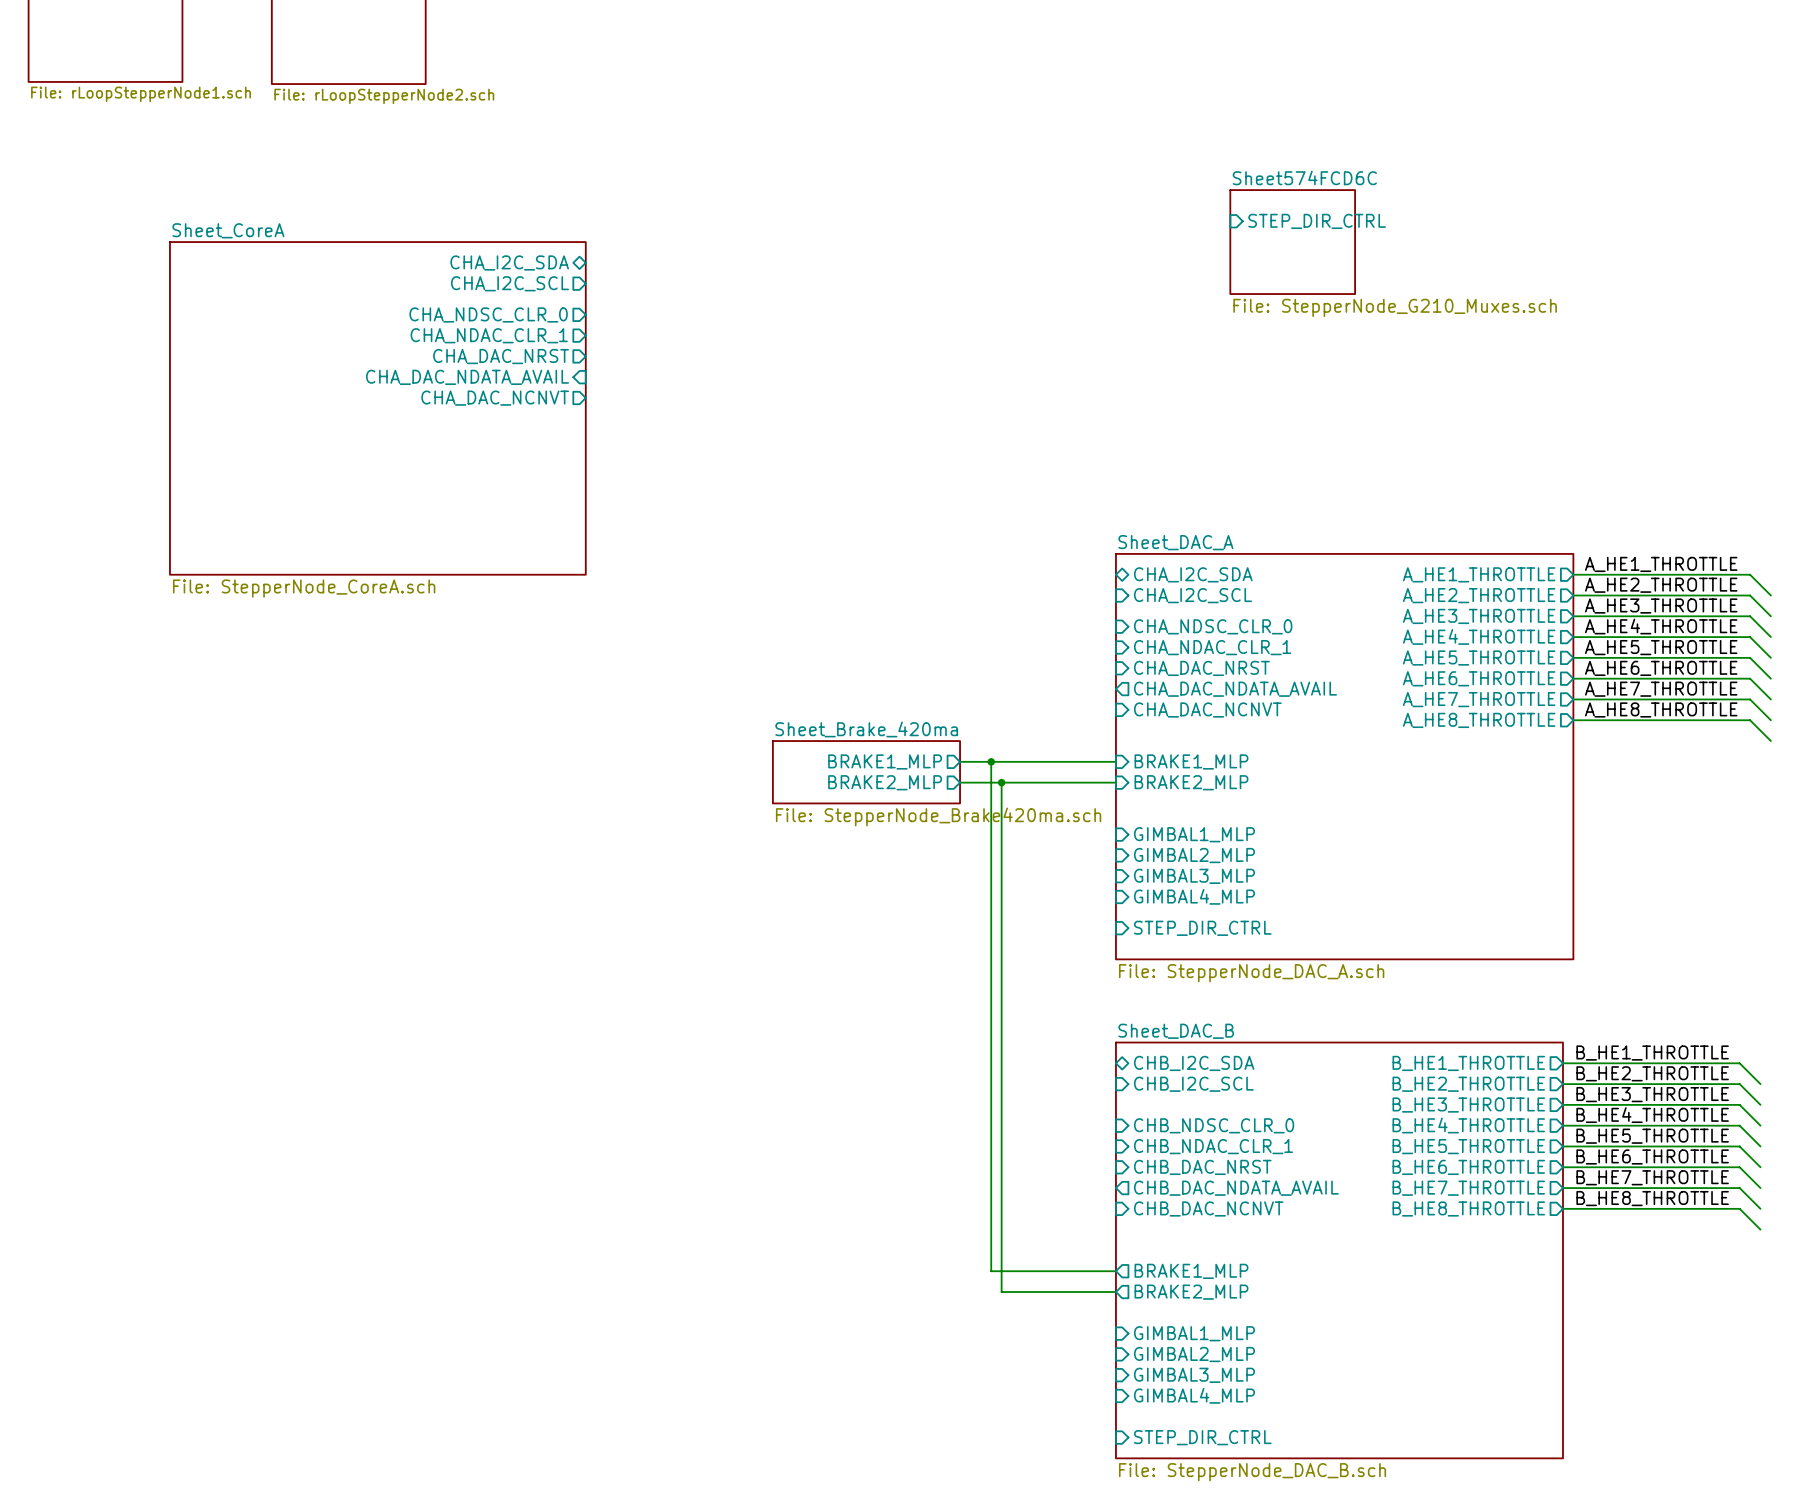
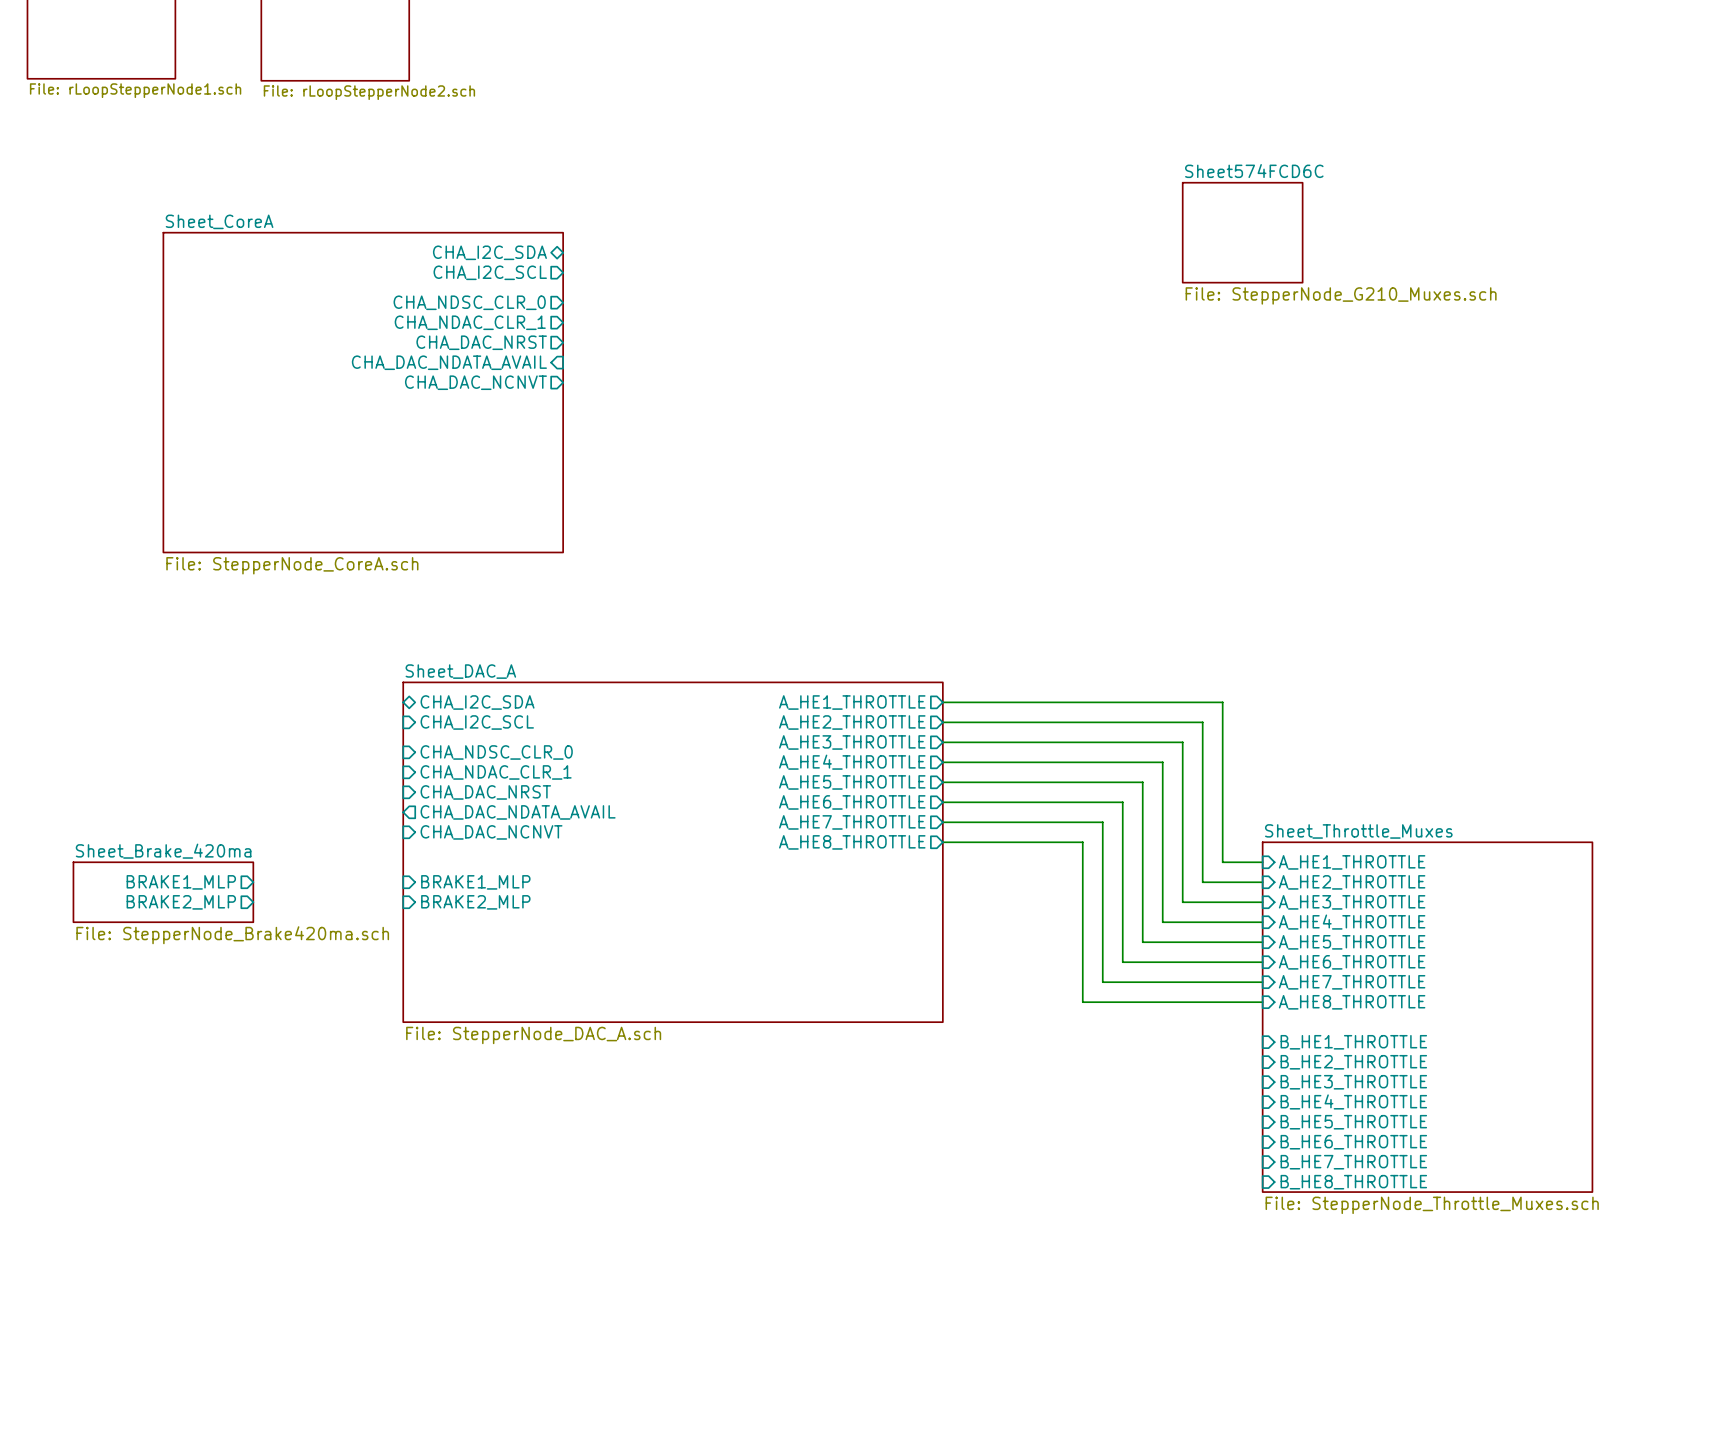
sheet pin: STEP_DIR_CTRL (1317, 221) -> none
label: A_HE1_THROTTLE (1661, 564) -> none
sheet pin: CHA_I2C_SDA (1193, 574) -> none
sheet pin: A_HE1_THROTTLE (1479, 574) -> none
wire: (1573, 574) (1750, 574) (1770, 595) -> none
label: A_HE2_THROTTLE (1661, 585) -> none
sheet pin: CHA_I2C_SCL (1192, 595) -> none
sheet pin: A_HE2_THROTTLE (1479, 595) -> none
wire: (1573, 595) (1750, 595) (1770, 616) -> none
label: A_HE3_THROTTLE (1661, 606) -> none
sheet pin: A_HE3_THROTTLE (1479, 616) -> none
wire: (1573, 616) (1750, 616) (1770, 637) -> none
sheet pin: CHA_NDSC_CLR_0 (1213, 626) -> none
label: A_HE4_THROTTLE (1661, 626) -> none
sheet pin: A_HE4_THROTTLE (1479, 636) -> none
wire: (1573, 637) (1750, 637) (1770, 657) -> none
sheet pin: CHA_NDAC_CLR_1 (1212, 647) -> none
label: A_HE5_THROTTLE (1661, 647) -> none
wire: (1573, 657) (1750, 657) (1770, 678) -> none
sheet pin: A_HE5_THROTTLE (1479, 658) -> none
sheet pin: CHA_DAC_NRST (1201, 668) -> none
label: A_HE6_THROTTLE (1661, 668) -> none
sheet pin: A_HE6_THROTTLE (1479, 678) -> none
wire: (1573, 678) (1750, 678) (1770, 699) -> none
sheet pin: CHA_DAC_NDATA_AVAIL (1235, 689) -> none
label: A_HE7_THROTTLE (1661, 689) -> none
sheet pin: A_HE7_THROTTLE (1479, 699) -> none
wire: (1573, 699) (1750, 699) (1770, 720) -> none
sheet pin: CHA_DAC_NCNVT (1207, 709) -> none
label: A_HE8_THROTTLE (1661, 709) -> none
sheet pin: A_HE8_THROTTLE (1479, 720) -> none
wire: (1573, 720) (1750, 720) (1770, 741) -> none
sheet pin: none -> CHA_I2C_SDA (477, 702)
sheet pin: none -> A_HE1_THROTTLE (852, 702)
wire: none -> (942, 702) (1222, 702) (1222, 862) (1262, 862)
sheet pin: none -> CHA_I2C_SCL (477, 722)
sheet pin: none -> A_HE2_THROTTLE (852, 722)
wire: none -> (942, 722) (1202, 722) (1202, 882) (1262, 882)
sheet Sheet_DAC_A: File: StepperNode_DAC_A.sch (1344, 756) -> none
sheet pin: BRAKE1_MLP (885, 761) -> none
wire: (960, 761) (1115, 761) -> none
wire: (991, 761) (991, 1271) (1115, 1271) -> none
junction: (991, 761) -> none
sheet pin: BRAKE1_MLP (1191, 761) -> none
sheet Sheet_Brake_420ma position: (866, 772) -> (163, 892)
sheet pin: none -> A_HE3_THROTTLE (852, 742)
wire: none -> (942, 742) (1182, 742) (1182, 902) (1262, 902)
sheet pin: none -> CHA_NDSC_CLR_0 (496, 752)
sheet pin: BRAKE2_MLP (885, 782) -> none
wire: (960, 782) (1115, 782) -> none
wire: (1001, 782) (1001, 1292) (1115, 1292) -> none
junction: (1001, 782) -> none
sheet pin: BRAKE2_MLP (1191, 782) -> none
sheet pin: none -> A_HE4_THROTTLE (852, 762)
wire: none -> (942, 762) (1162, 762) (1162, 922) (1262, 922)
sheet pin: none -> CHA_NDAC_CLR_1 (496, 772)
sheet pin: none -> A_HE5_THROTTLE (852, 782)
wire: none -> (942, 782) (1142, 782) (1142, 942) (1262, 942)
sheet pin: none -> CHA_DAC_NRST (485, 792)
sheet pin: none -> A_HE6_THROTTLE (852, 802)
wire: none -> (942, 802) (1122, 802) (1122, 962) (1262, 962)
sheet pin: GIMBAL1_MLP (1194, 834) -> none
sheet pin: none -> CHA_DAC_NDATA_AVAIL (518, 812)
sheet pin: none -> A_HE7_THROTTLE (852, 822)
wire: none -> (942, 822) (1102, 822) (1102, 982) (1262, 982)
sheet pin: GIMBAL2_MLP (1194, 855) -> none
sheet pin: none -> CHA_DAC_NCNVT (491, 832)
sheet pin: none -> A_HE8_THROTTLE (852, 842)
wire: none -> (942, 842) (1082, 842) (1082, 1002) (1262, 1002)
sheet pin: GIMBAL3_MLP (1194, 876) -> none
sheet Sheet_DAC_A: none -> File: StepperNode_DAC_A.sch (673, 852)
sheet pin: GIMBAL4_MLP (1194, 896) -> none
sheet pin: none -> A_HE1_THROTTLE (1352, 862)
sheet pin: none -> BRAKE1_MLP (181, 882)
sheet pin: none -> BRAKE1_MLP (475, 882)
sheet pin: none -> A_HE2_THROTTLE (1352, 882)
sheet pin: STEP_DIR_CTRL (1202, 928) -> none
sheet pin: none -> BRAKE2_MLP (181, 902)
sheet pin: none -> BRAKE2_MLP (475, 902)
sheet pin: none -> A_HE3_THROTTLE (1352, 902)
sheet pin: none -> A_HE4_THROTTLE (1352, 922)
sheet pin: none -> A_HE5_THROTTLE (1352, 942)
sheet pin: none -> A_HE6_THROTTLE (1352, 962)
sheet pin: none -> A_HE7_THROTTLE (1352, 982)
sheet pin: none -> A_HE8_THROTTLE (1352, 1002)
label: B_HE1_THROTTLE (1652, 1053) -> none
sheet Sheet_Throttle_Muxes: none -> File: StepperNode_Throttle_Muxes.sch (1427, 1017)
sheet pin: CHB_I2C_SDA (1194, 1063) -> none
sheet pin: B_HE1_THROTTLE (1468, 1063) -> none
wire: (1562, 1063) (1739, 1063) (1760, 1084) -> none
label: B_HE2_THROTTLE (1652, 1073) -> none
sheet pin: CHB_I2C_SCL (1193, 1084) -> none
sheet pin: none -> B_HE1_THROTTLE (1353, 1042)
sheet pin: B_HE2_THROTTLE (1468, 1084) -> none
wire: (1562, 1084) (1739, 1084) (1760, 1104) -> none
label: B_HE3_THROTTLE (1652, 1094) -> none
wire: (1562, 1104) (1739, 1104) (1760, 1125) -> none
sheet pin: none -> B_HE2_THROTTLE (1353, 1062)
sheet pin: B_HE3_THROTTLE (1468, 1105) -> none
label: B_HE4_THROTTLE (1652, 1115) -> none
sheet pin: CHB_NDSC_CLR_0 (1214, 1125) -> none
sheet pin: none -> B_HE3_THROTTLE (1353, 1082)
sheet pin: B_HE4_THROTTLE (1468, 1125) -> none
wire: (1562, 1125) (1739, 1125) (1760, 1146) -> none
label: B_HE5_THROTTLE (1652, 1136) -> none
sheet pin: CHB_NDAC_CLR_1 (1213, 1146) -> none
sheet pin: none -> B_HE4_THROTTLE (1353, 1101)
sheet pin: B_HE5_THROTTLE (1468, 1146) -> none
wire: (1562, 1146) (1739, 1146) (1760, 1167) -> none
label: B_HE6_THROTTLE (1652, 1156) -> none
sheet pin: CHB_DAC_NRST (1202, 1167) -> none
sheet pin: none -> B_HE5_THROTTLE (1353, 1122)
sheet pin: B_HE6_THROTTLE (1468, 1167) -> none
wire: (1562, 1167) (1739, 1167) (1760, 1188) -> none
label: B_HE7_THROTTLE (1652, 1177) -> none
sheet pin: CHB_DAC_NDATA_AVAIL (1236, 1188) -> none
sheet pin: none -> B_HE6_THROTTLE (1353, 1142)
sheet pin: B_HE7_THROTTLE (1468, 1188) -> none
wire: (1562, 1188) (1739, 1188) (1760, 1208) -> none
label: B_HE8_THROTTLE (1652, 1198) -> none
sheet pin: CHB_DAC_NCNVT (1208, 1208) -> none
sheet pin: none -> B_HE7_THROTTLE (1353, 1162)
sheet pin: B_HE8_THROTTLE (1468, 1208) -> none
wire: (1562, 1208) (1739, 1208) (1760, 1229) -> none
sheet pin: none -> B_HE8_THROTTLE (1353, 1182)
sheet Sheet_DAC_B: File: StepperNode_DAC_B.sch (1339, 1250) -> none
sheet pin: BRAKE1_MLP (1191, 1271) -> none
sheet pin: BRAKE2_MLP (1191, 1292) -> none
sheet pin: GIMBAL1_MLP (1194, 1333) -> none
sheet pin: GIMBAL2_MLP (1194, 1354) -> none
sheet pin: GIMBAL3_MLP (1194, 1375) -> none
sheet pin: GIMBAL4_MLP (1194, 1395) -> none
sheet pin: STEP_DIR_CTRL (1202, 1437) -> none

